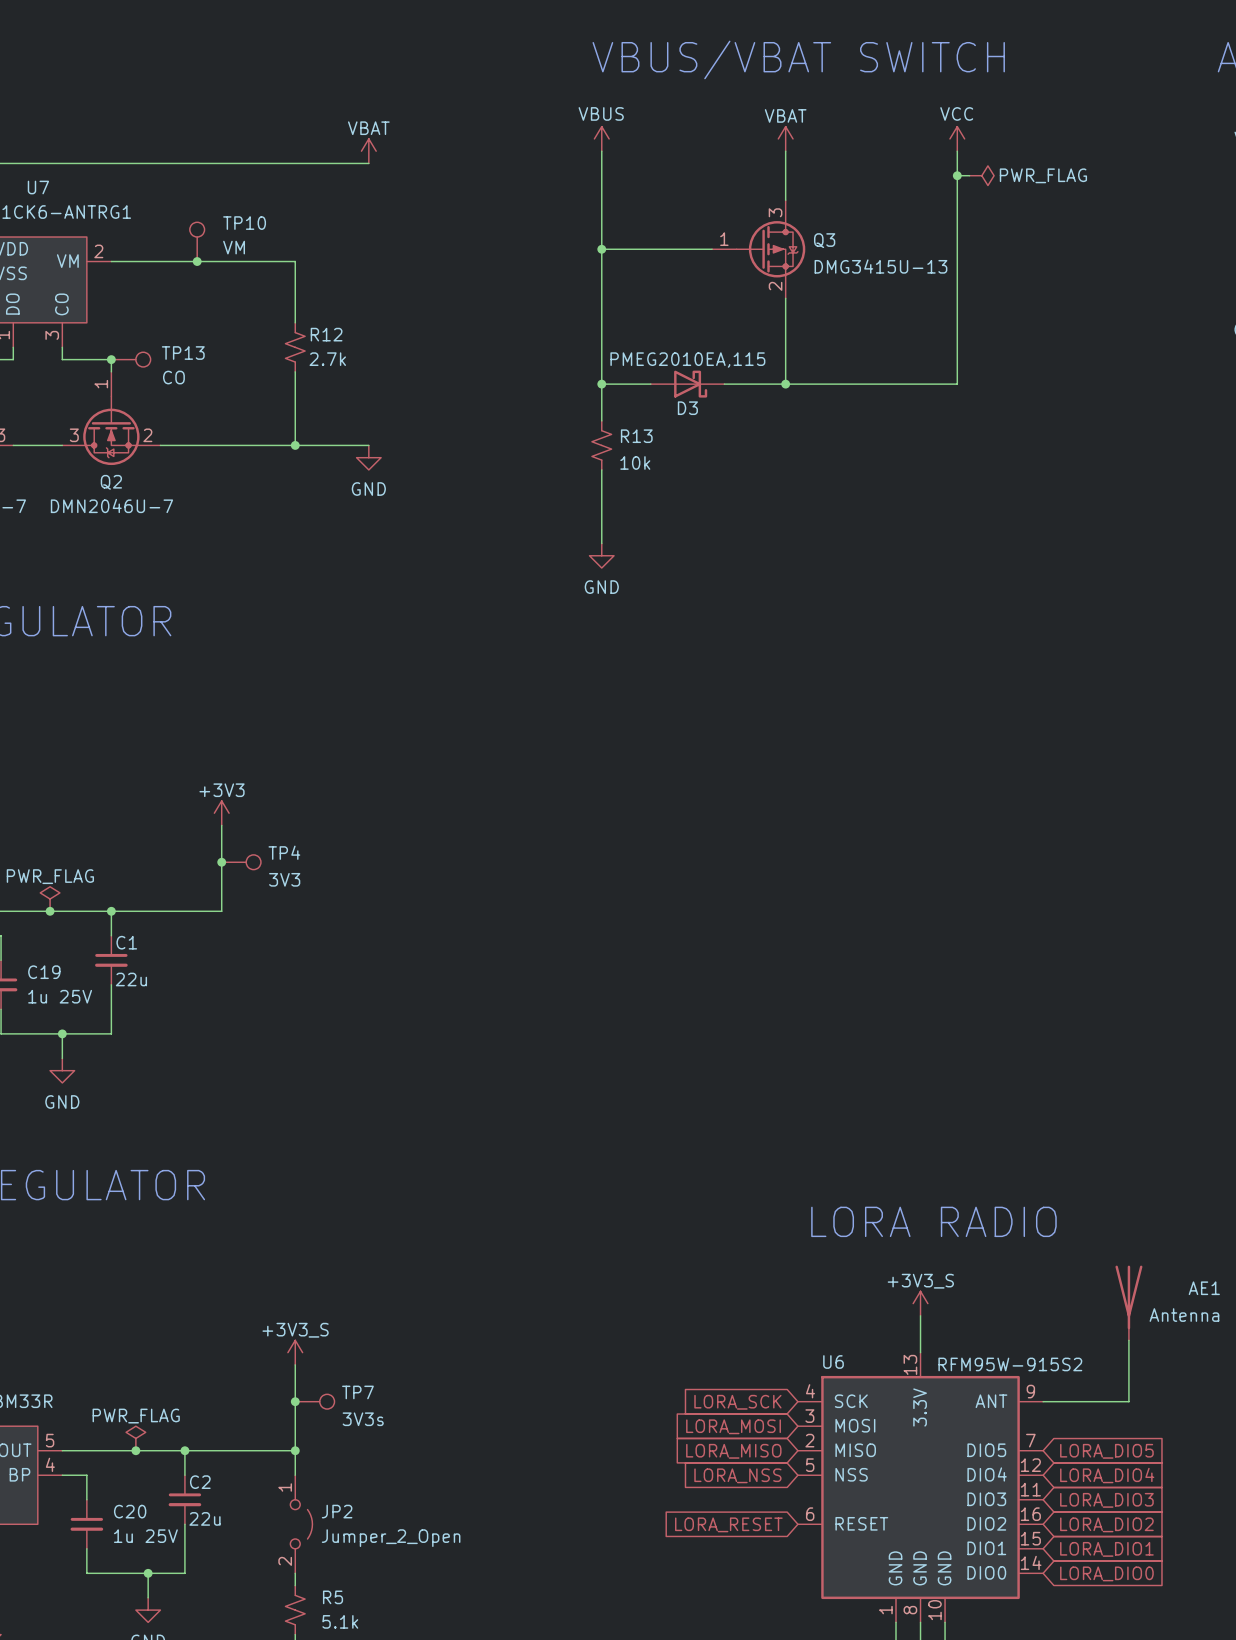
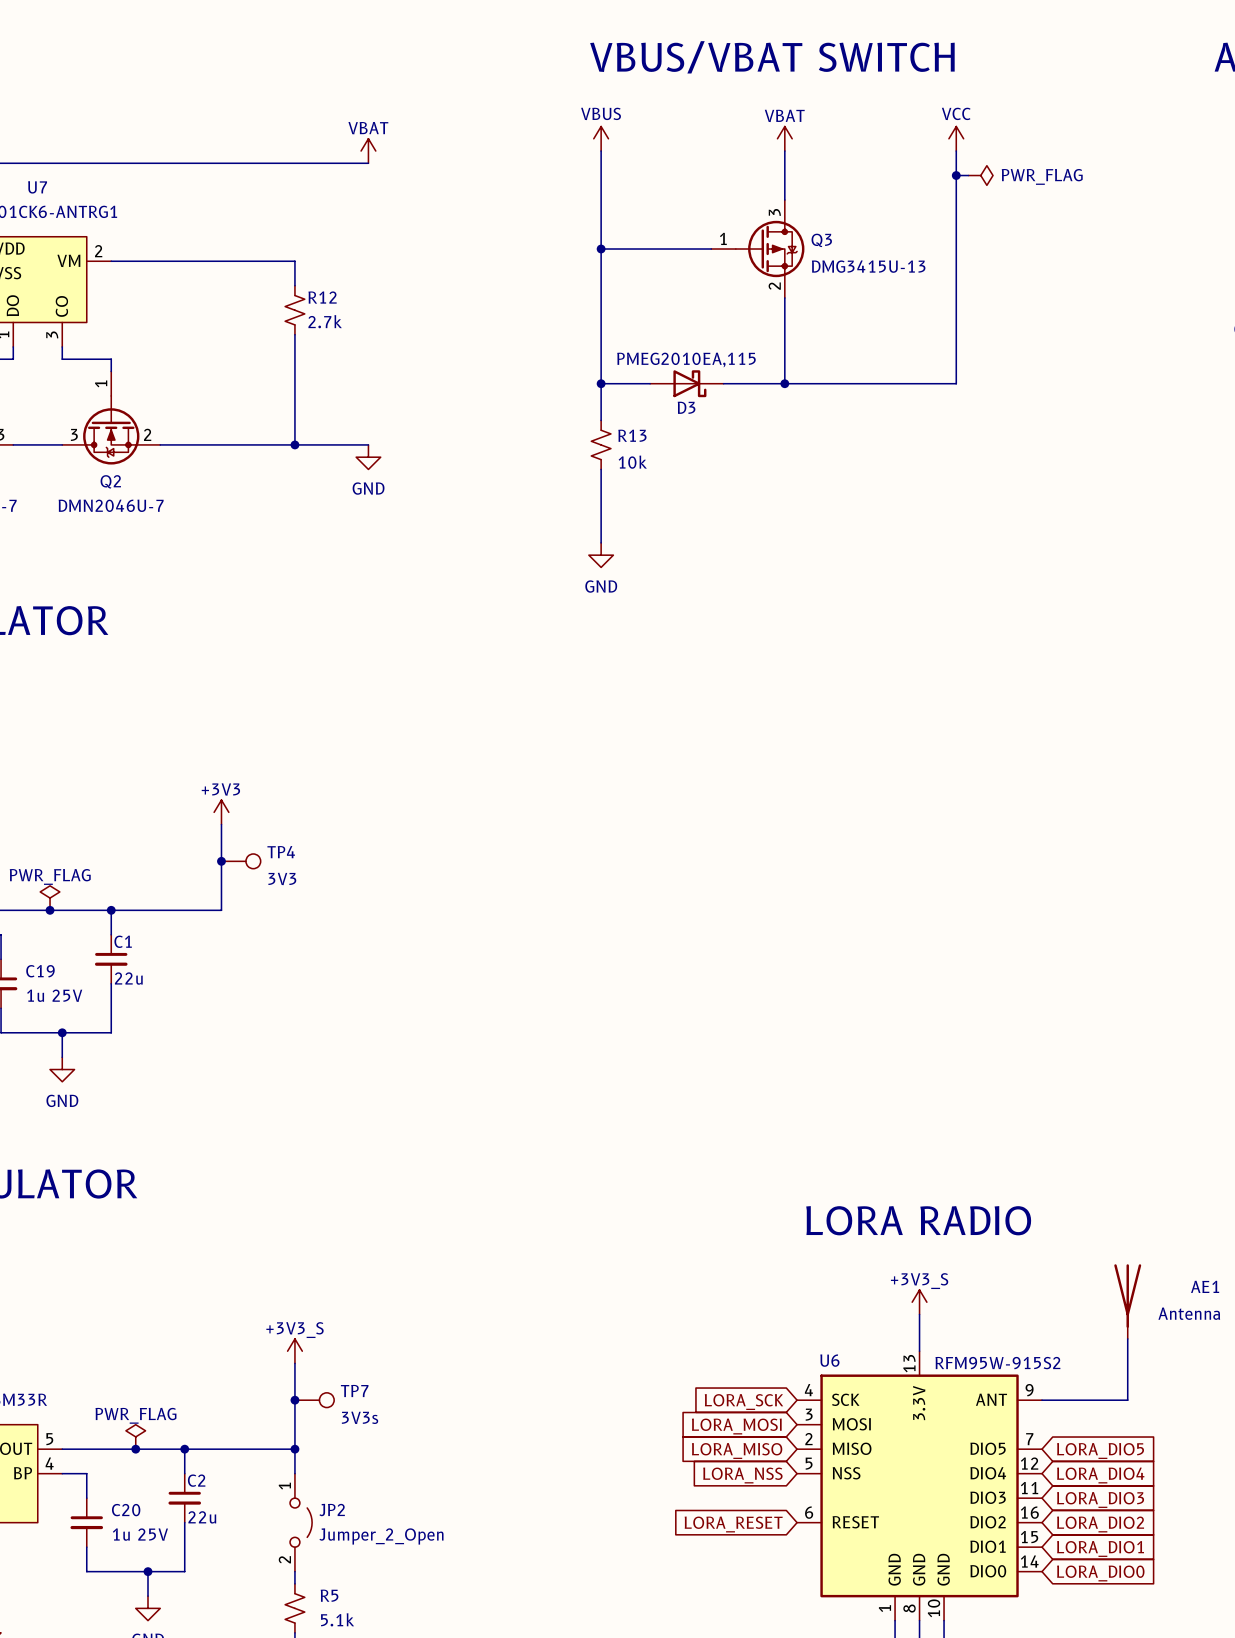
TP10: VM (197, 241) -> none
junction: (197, 261) -> none
wire: (295, 286) (295, 322) -> (294, 334) (294, 371)
R12 position: (295, 347) -> (294, 310)
junction: (111, 359) -> none
TP13: CO (130, 359) -> none

